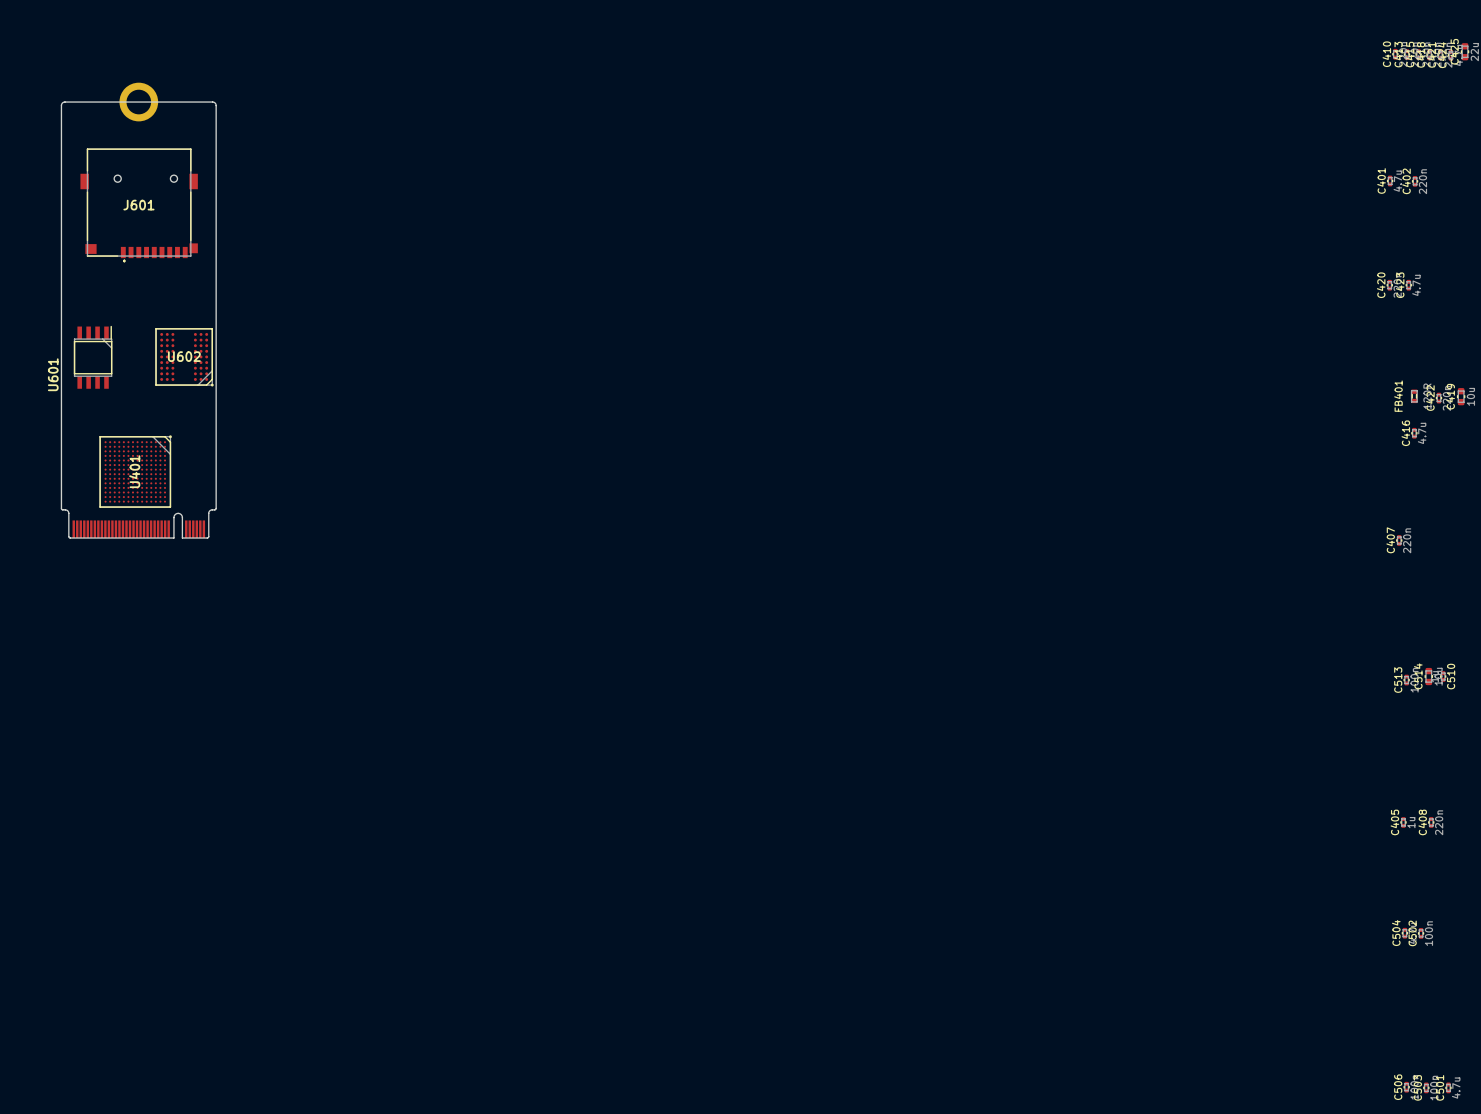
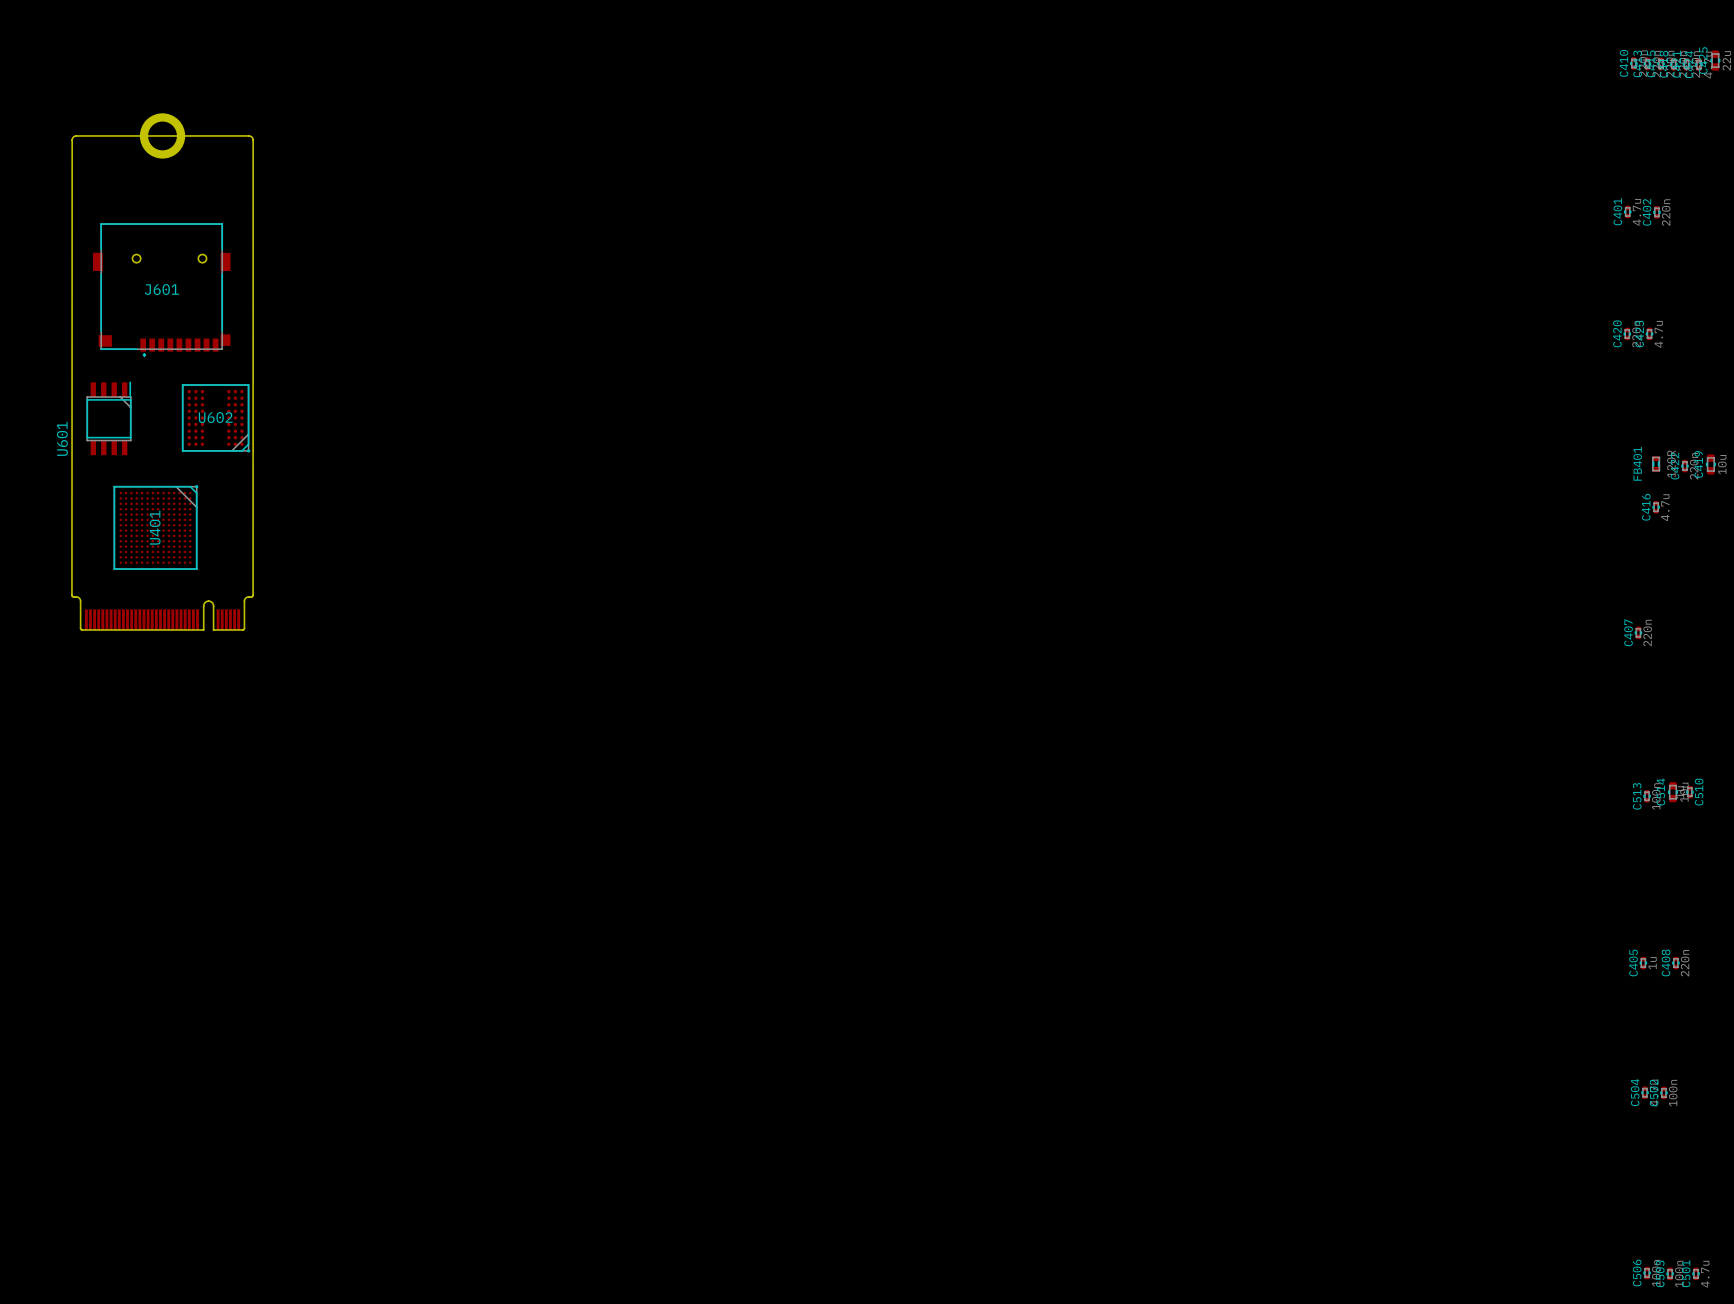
J601 position: (139, 205) -> (161, 289)
part: (138, 310) -> none
part: none -> (162, 371)
U401 position: (135, 471) -> (155, 527)

